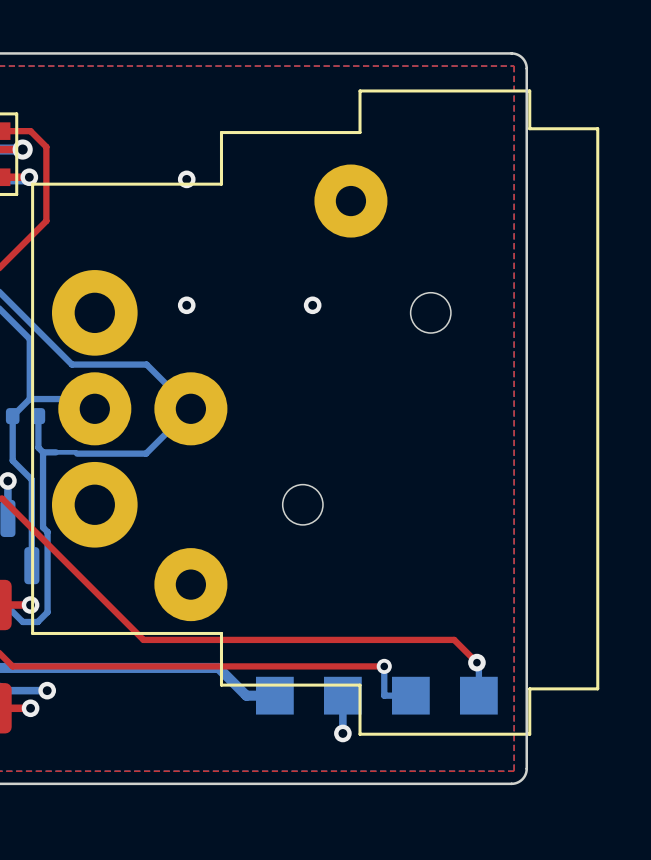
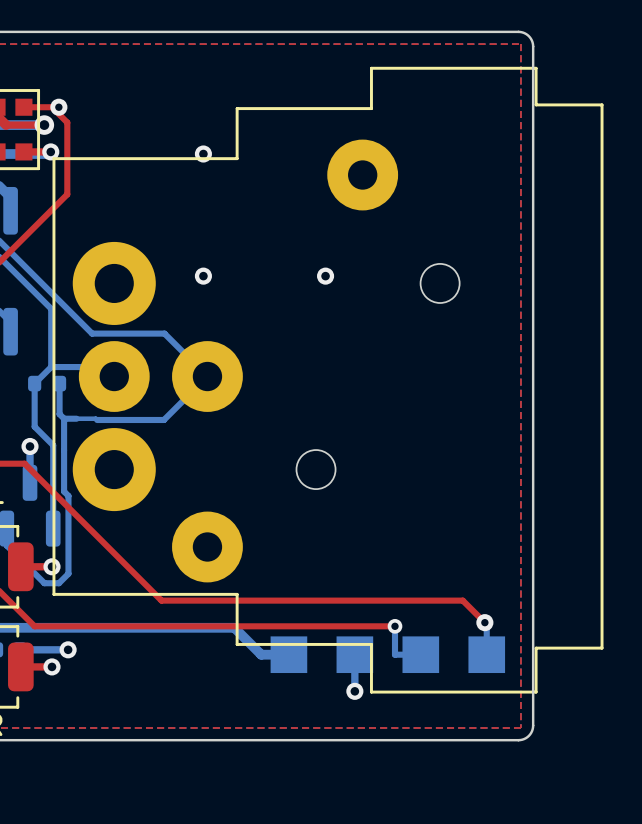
via: none -> (58, 107)

